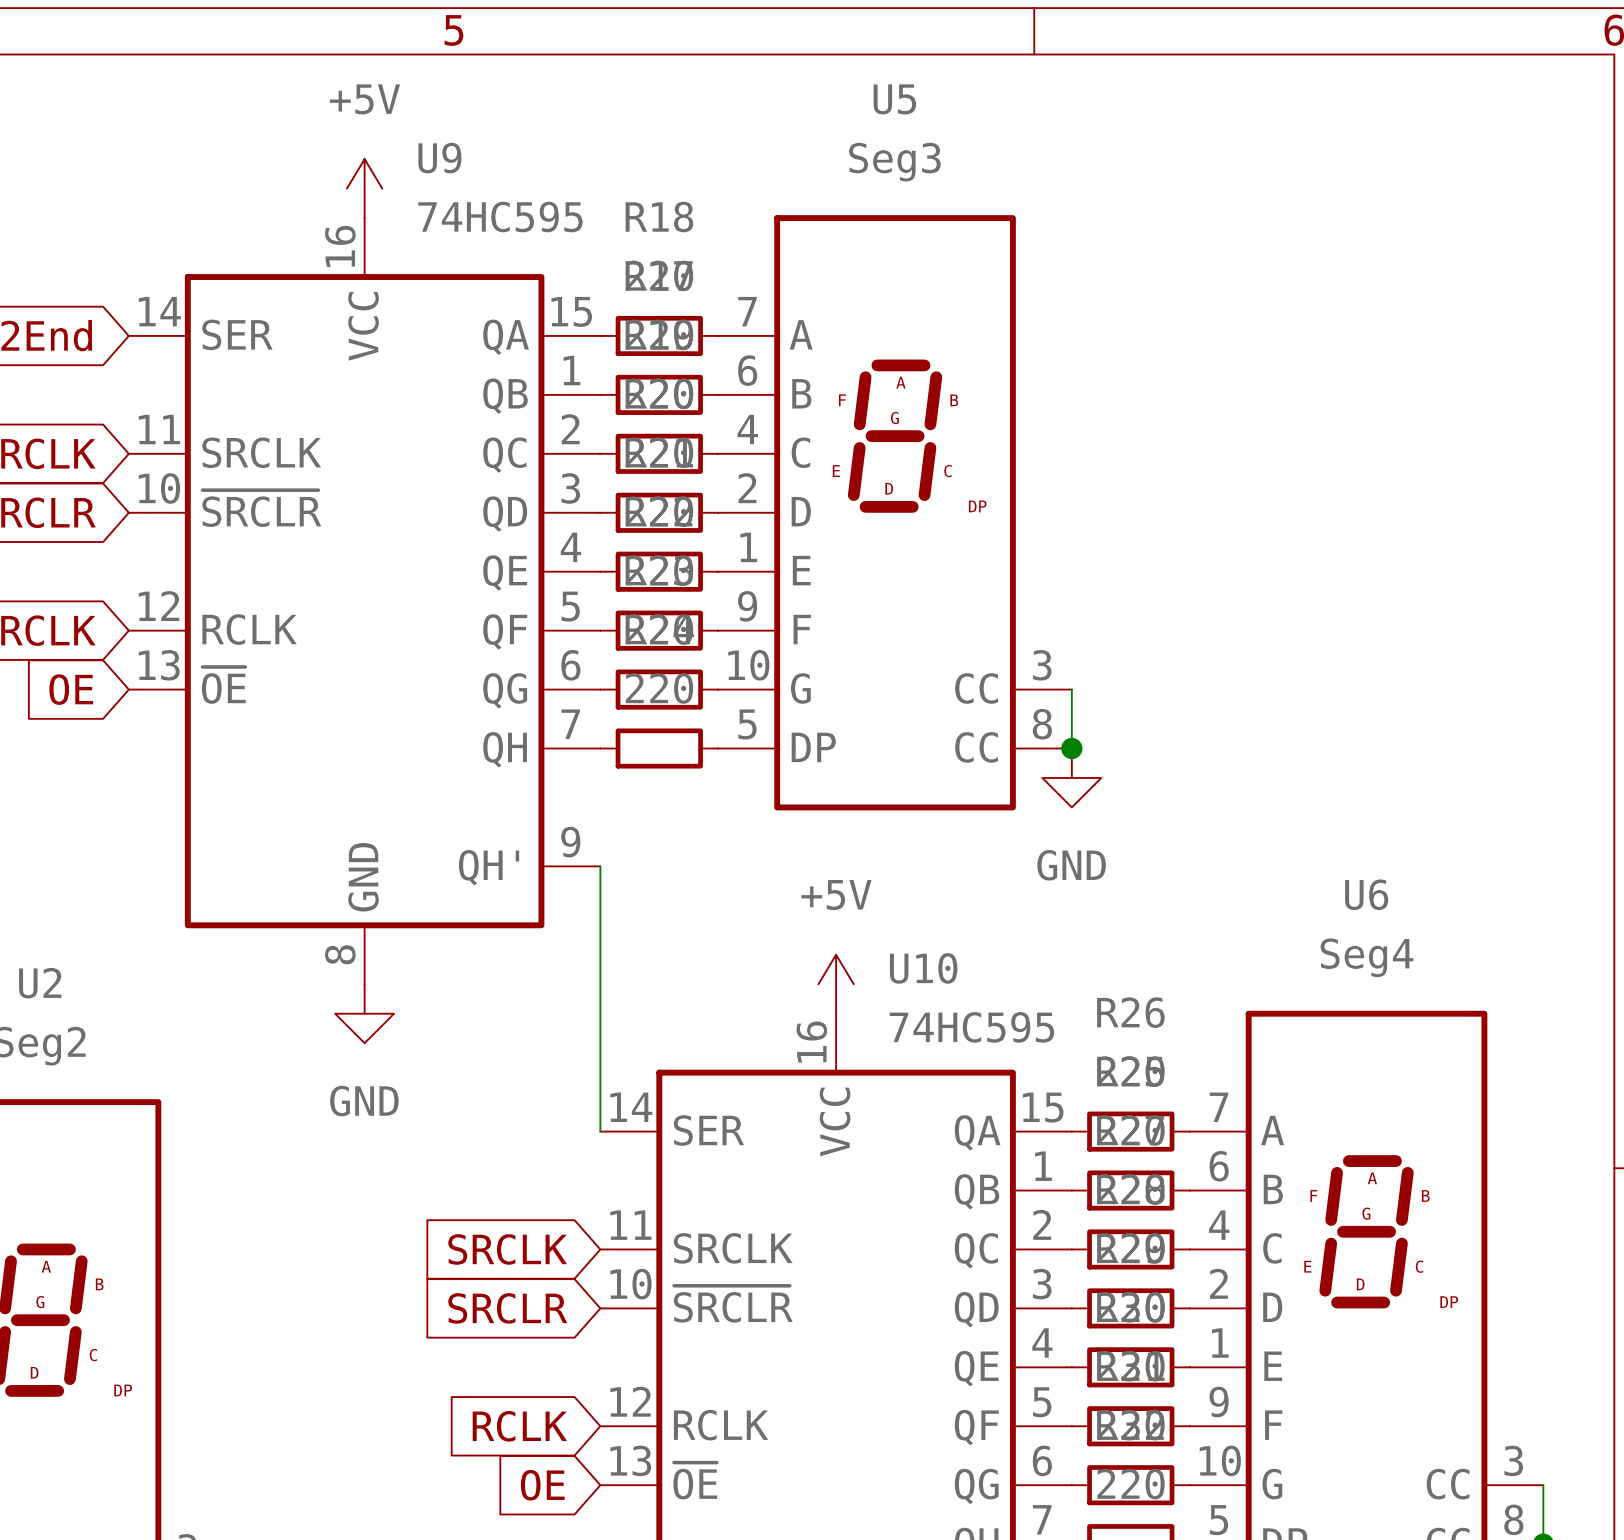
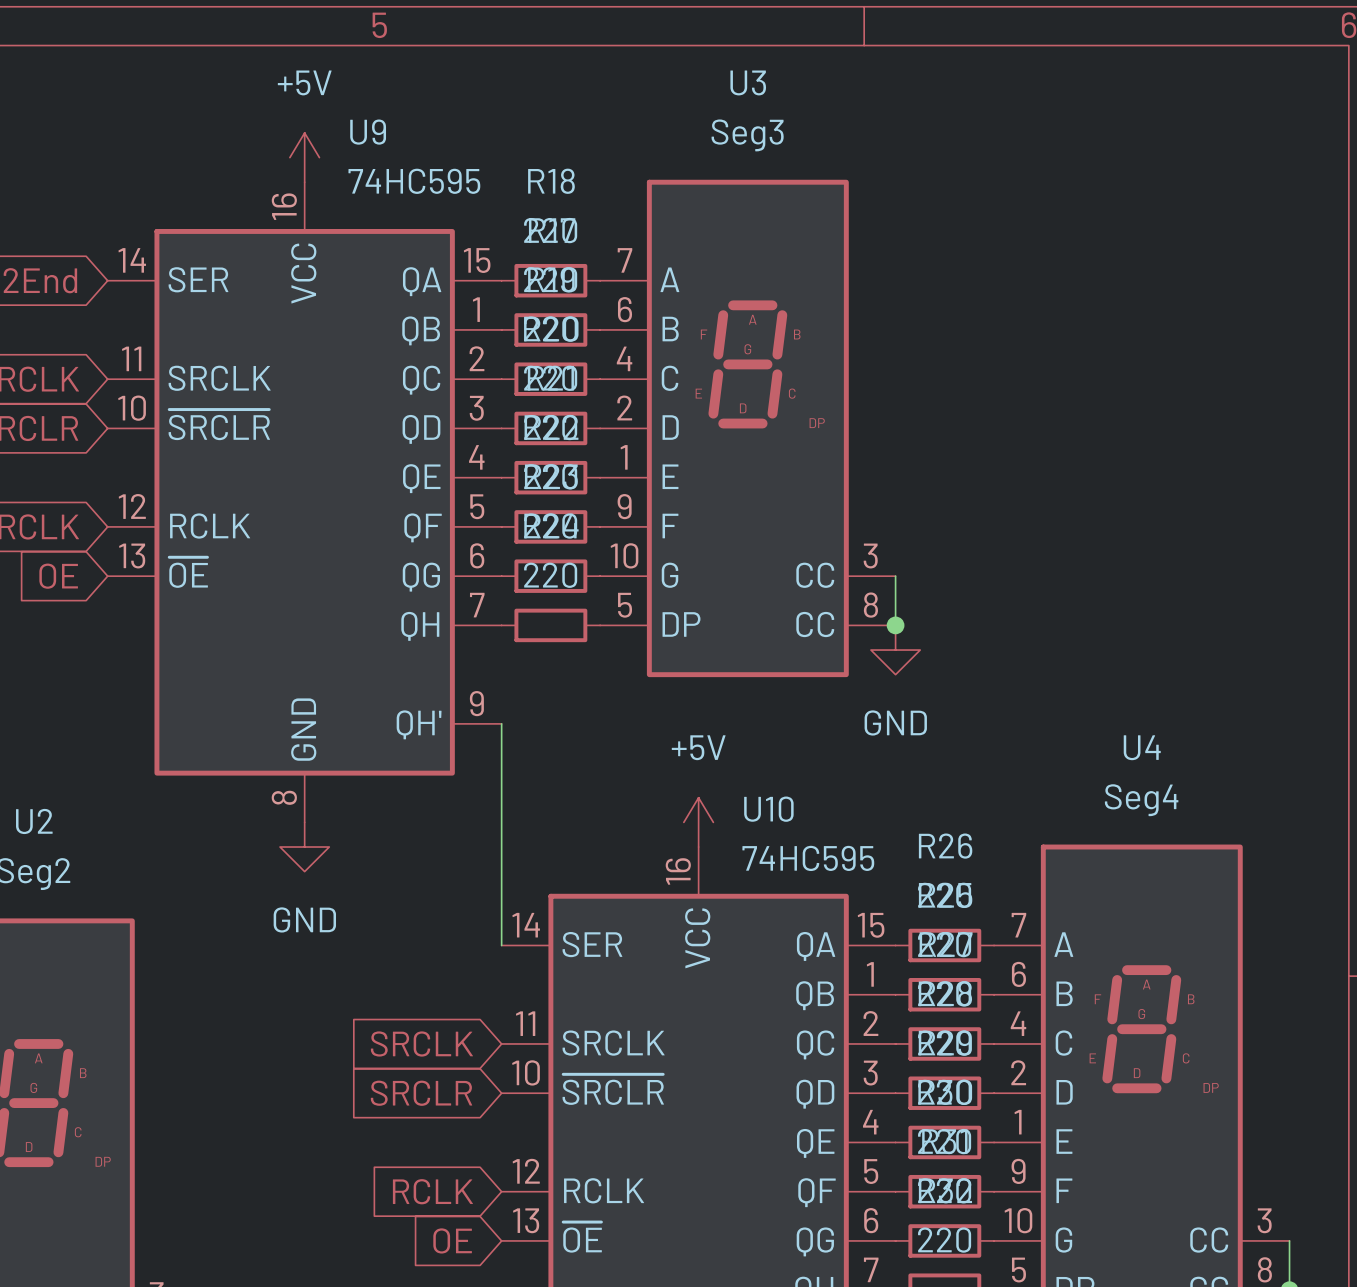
U5 name: U5 (894, 99) -> U3 (748, 82)
U6 name: U6 (1366, 894) -> U4 (1142, 747)

